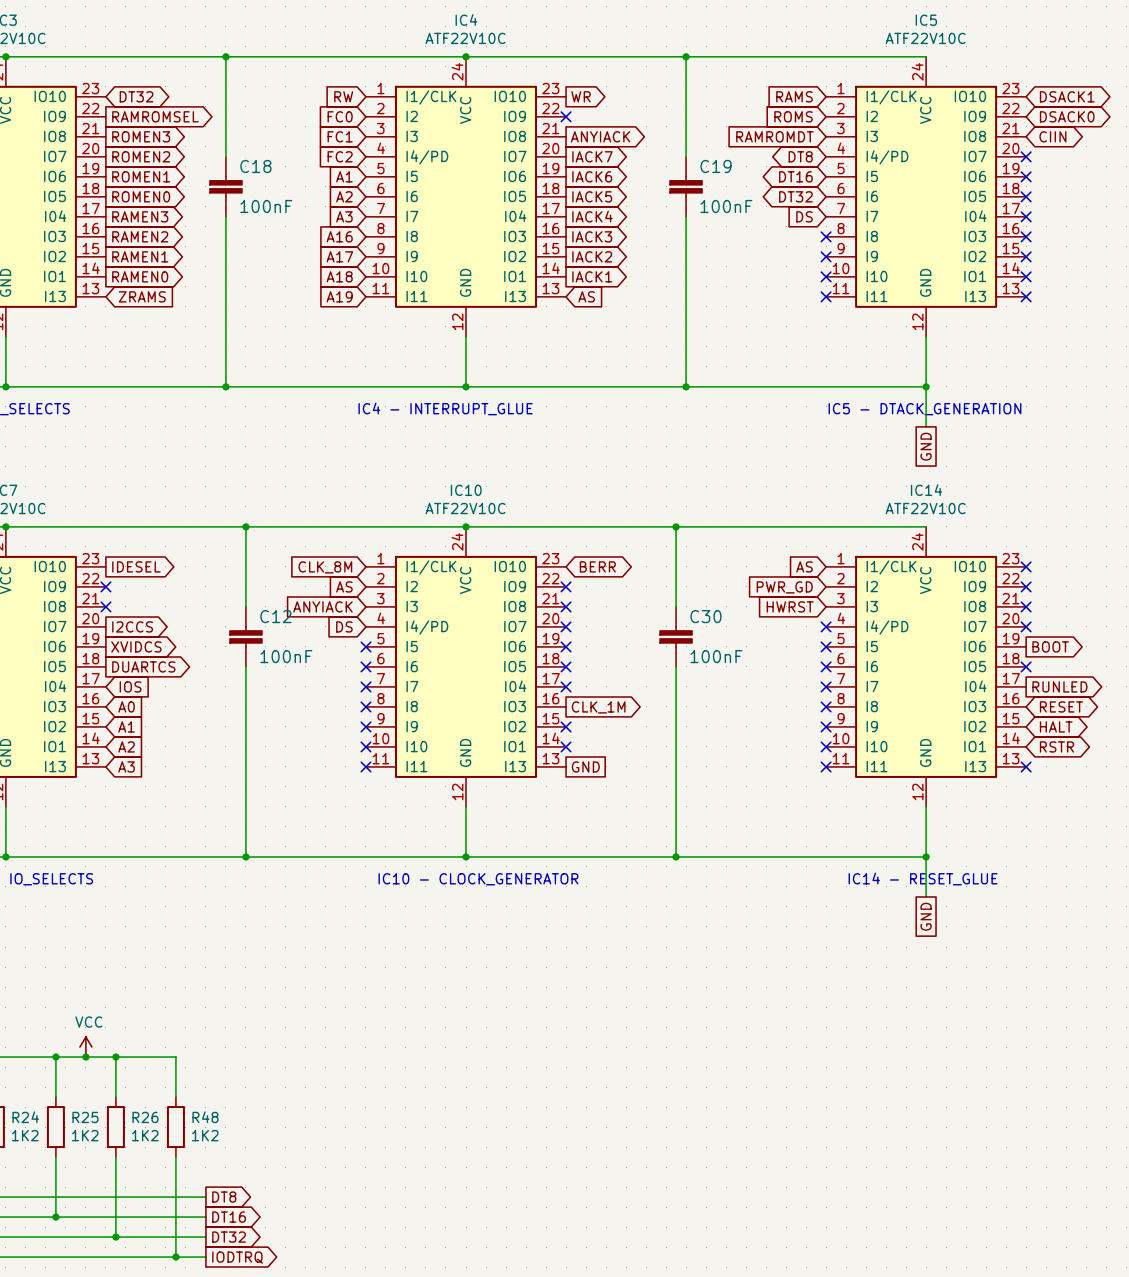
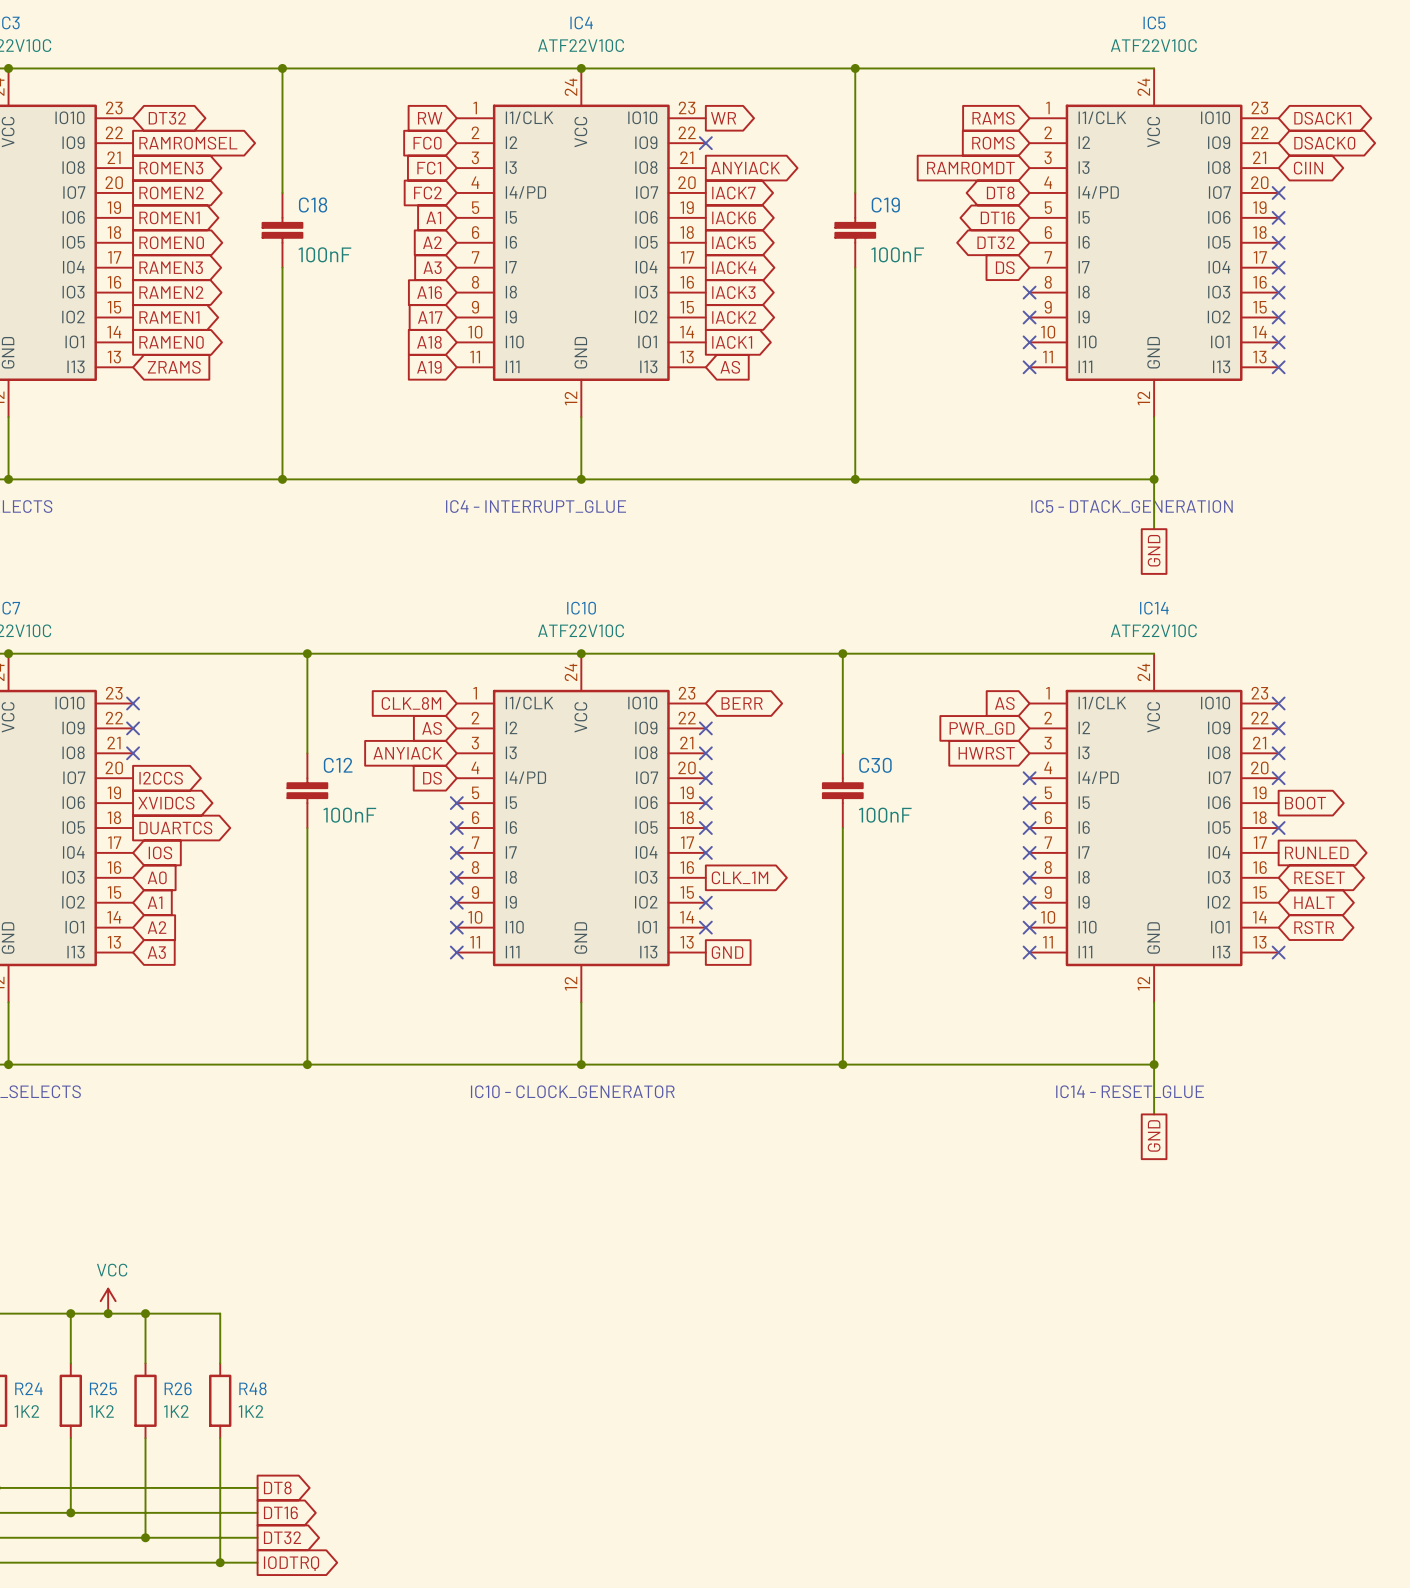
no-connect mark: none -> (133, 703)
global label: IDESEL (136, 566) -> none

